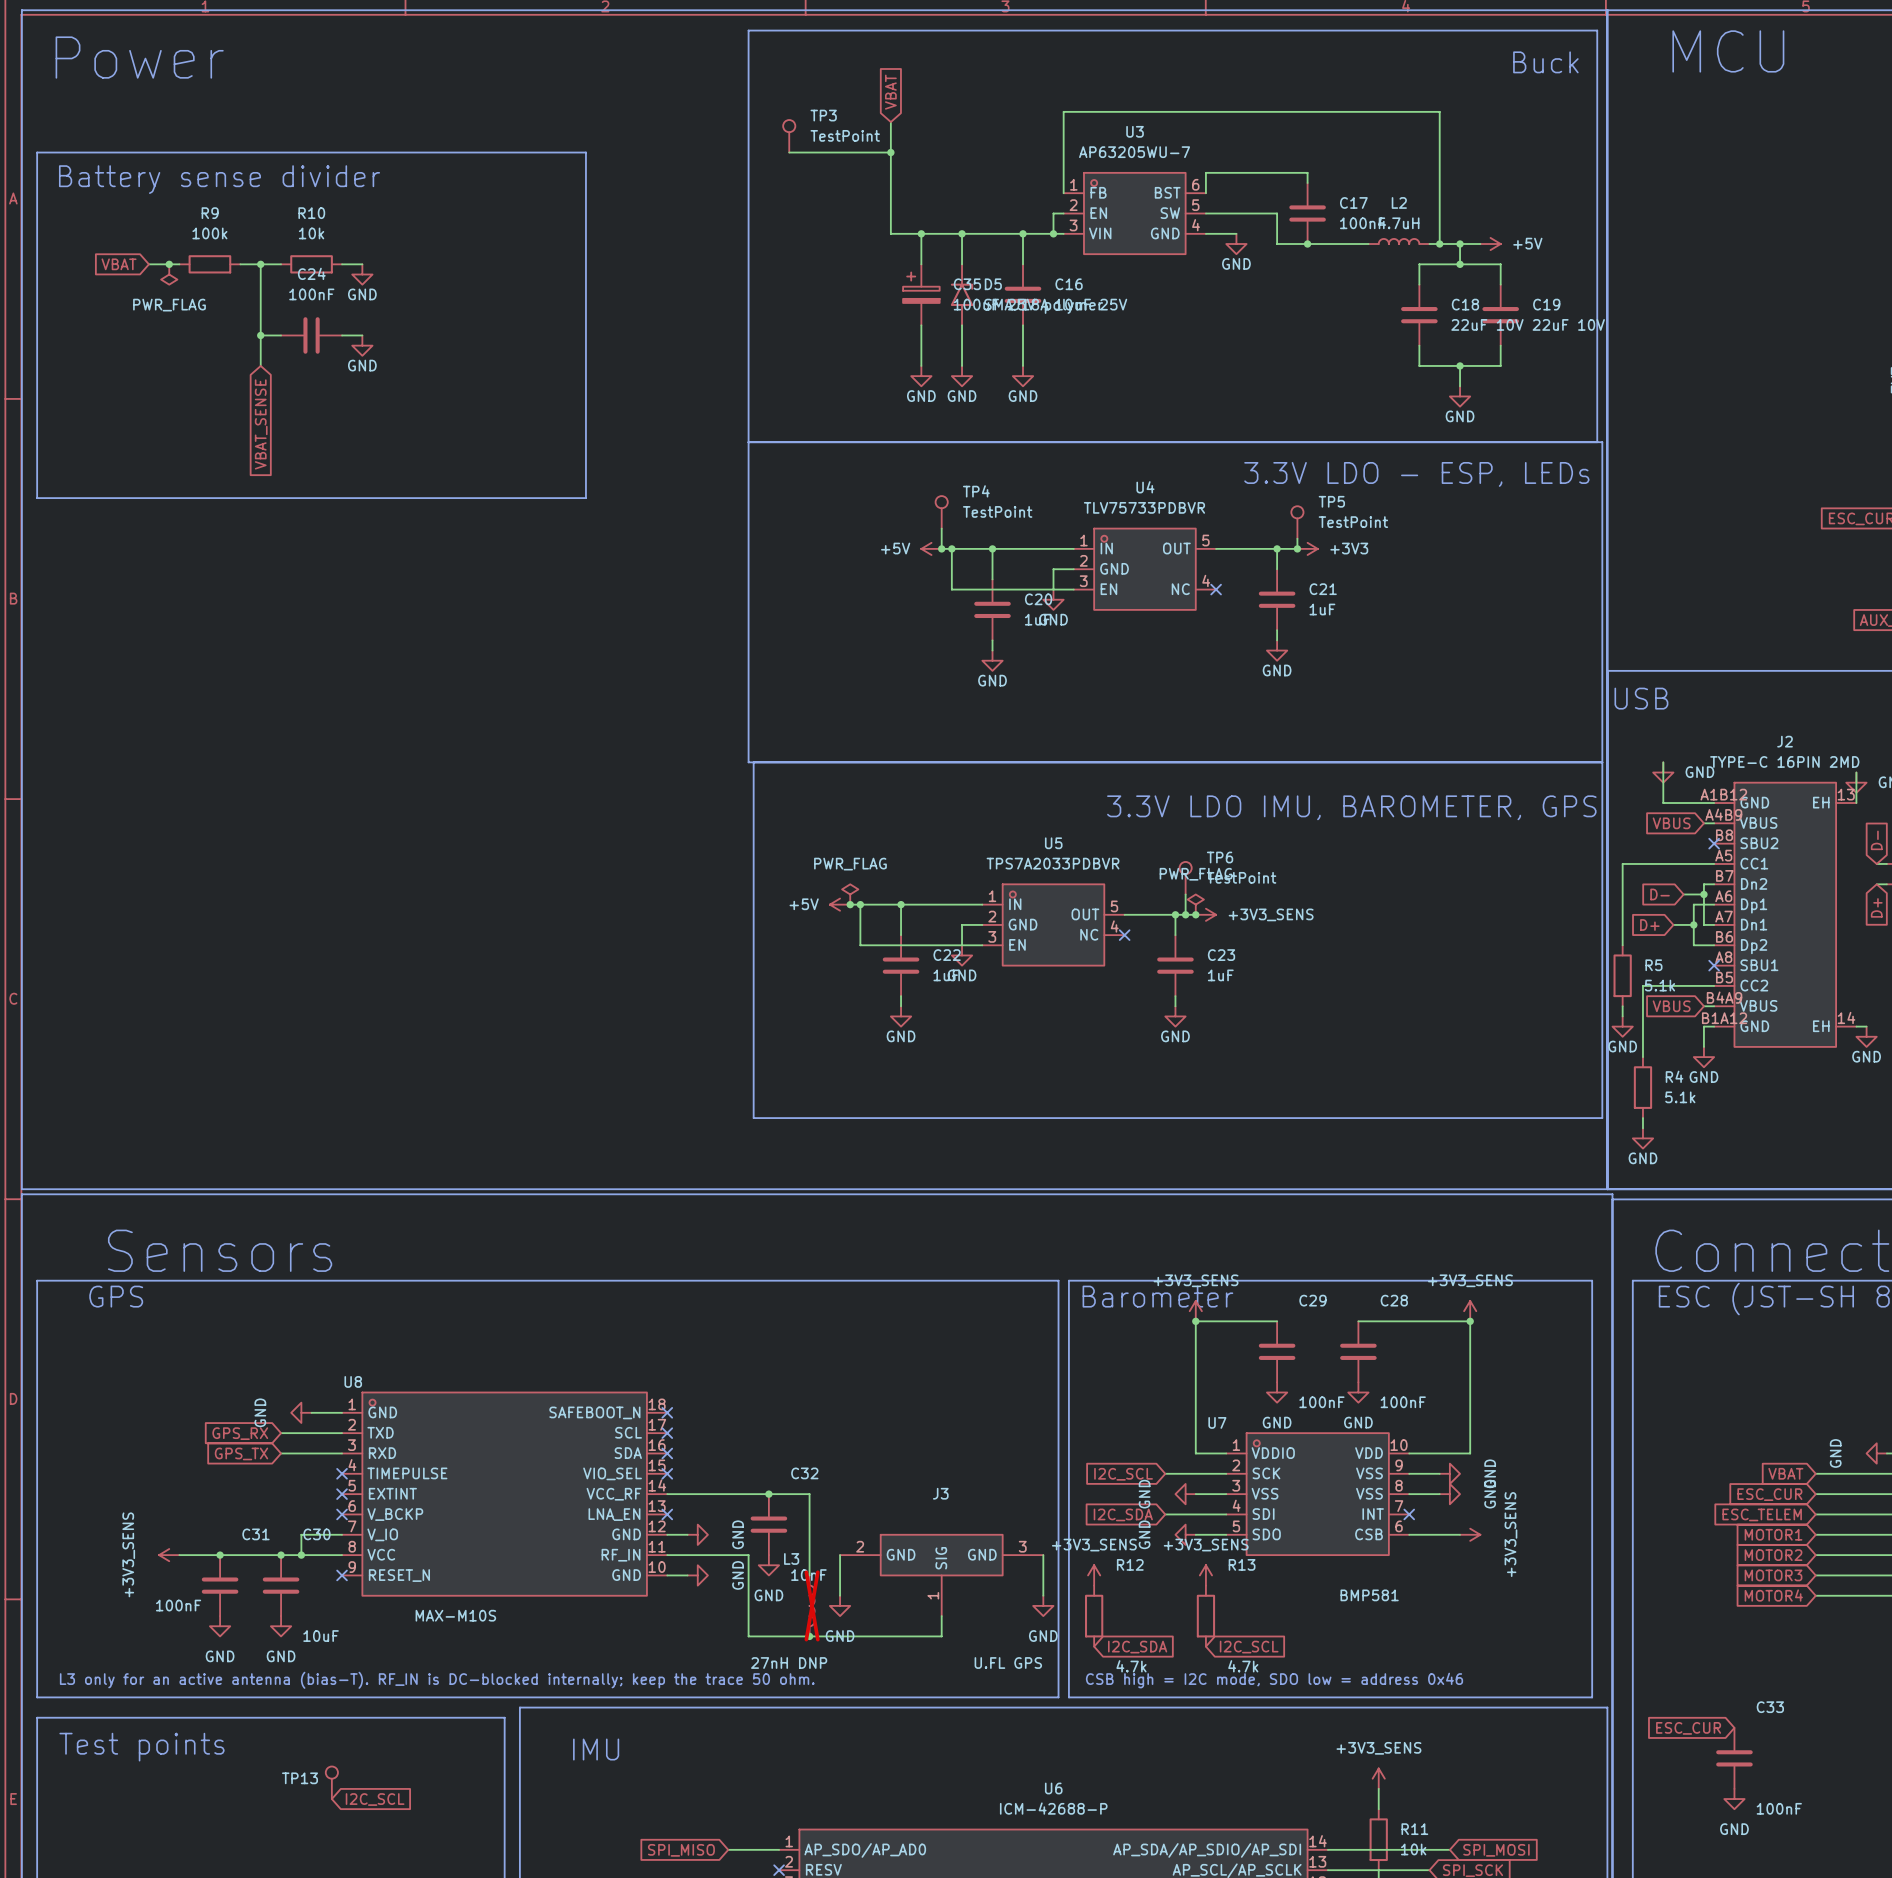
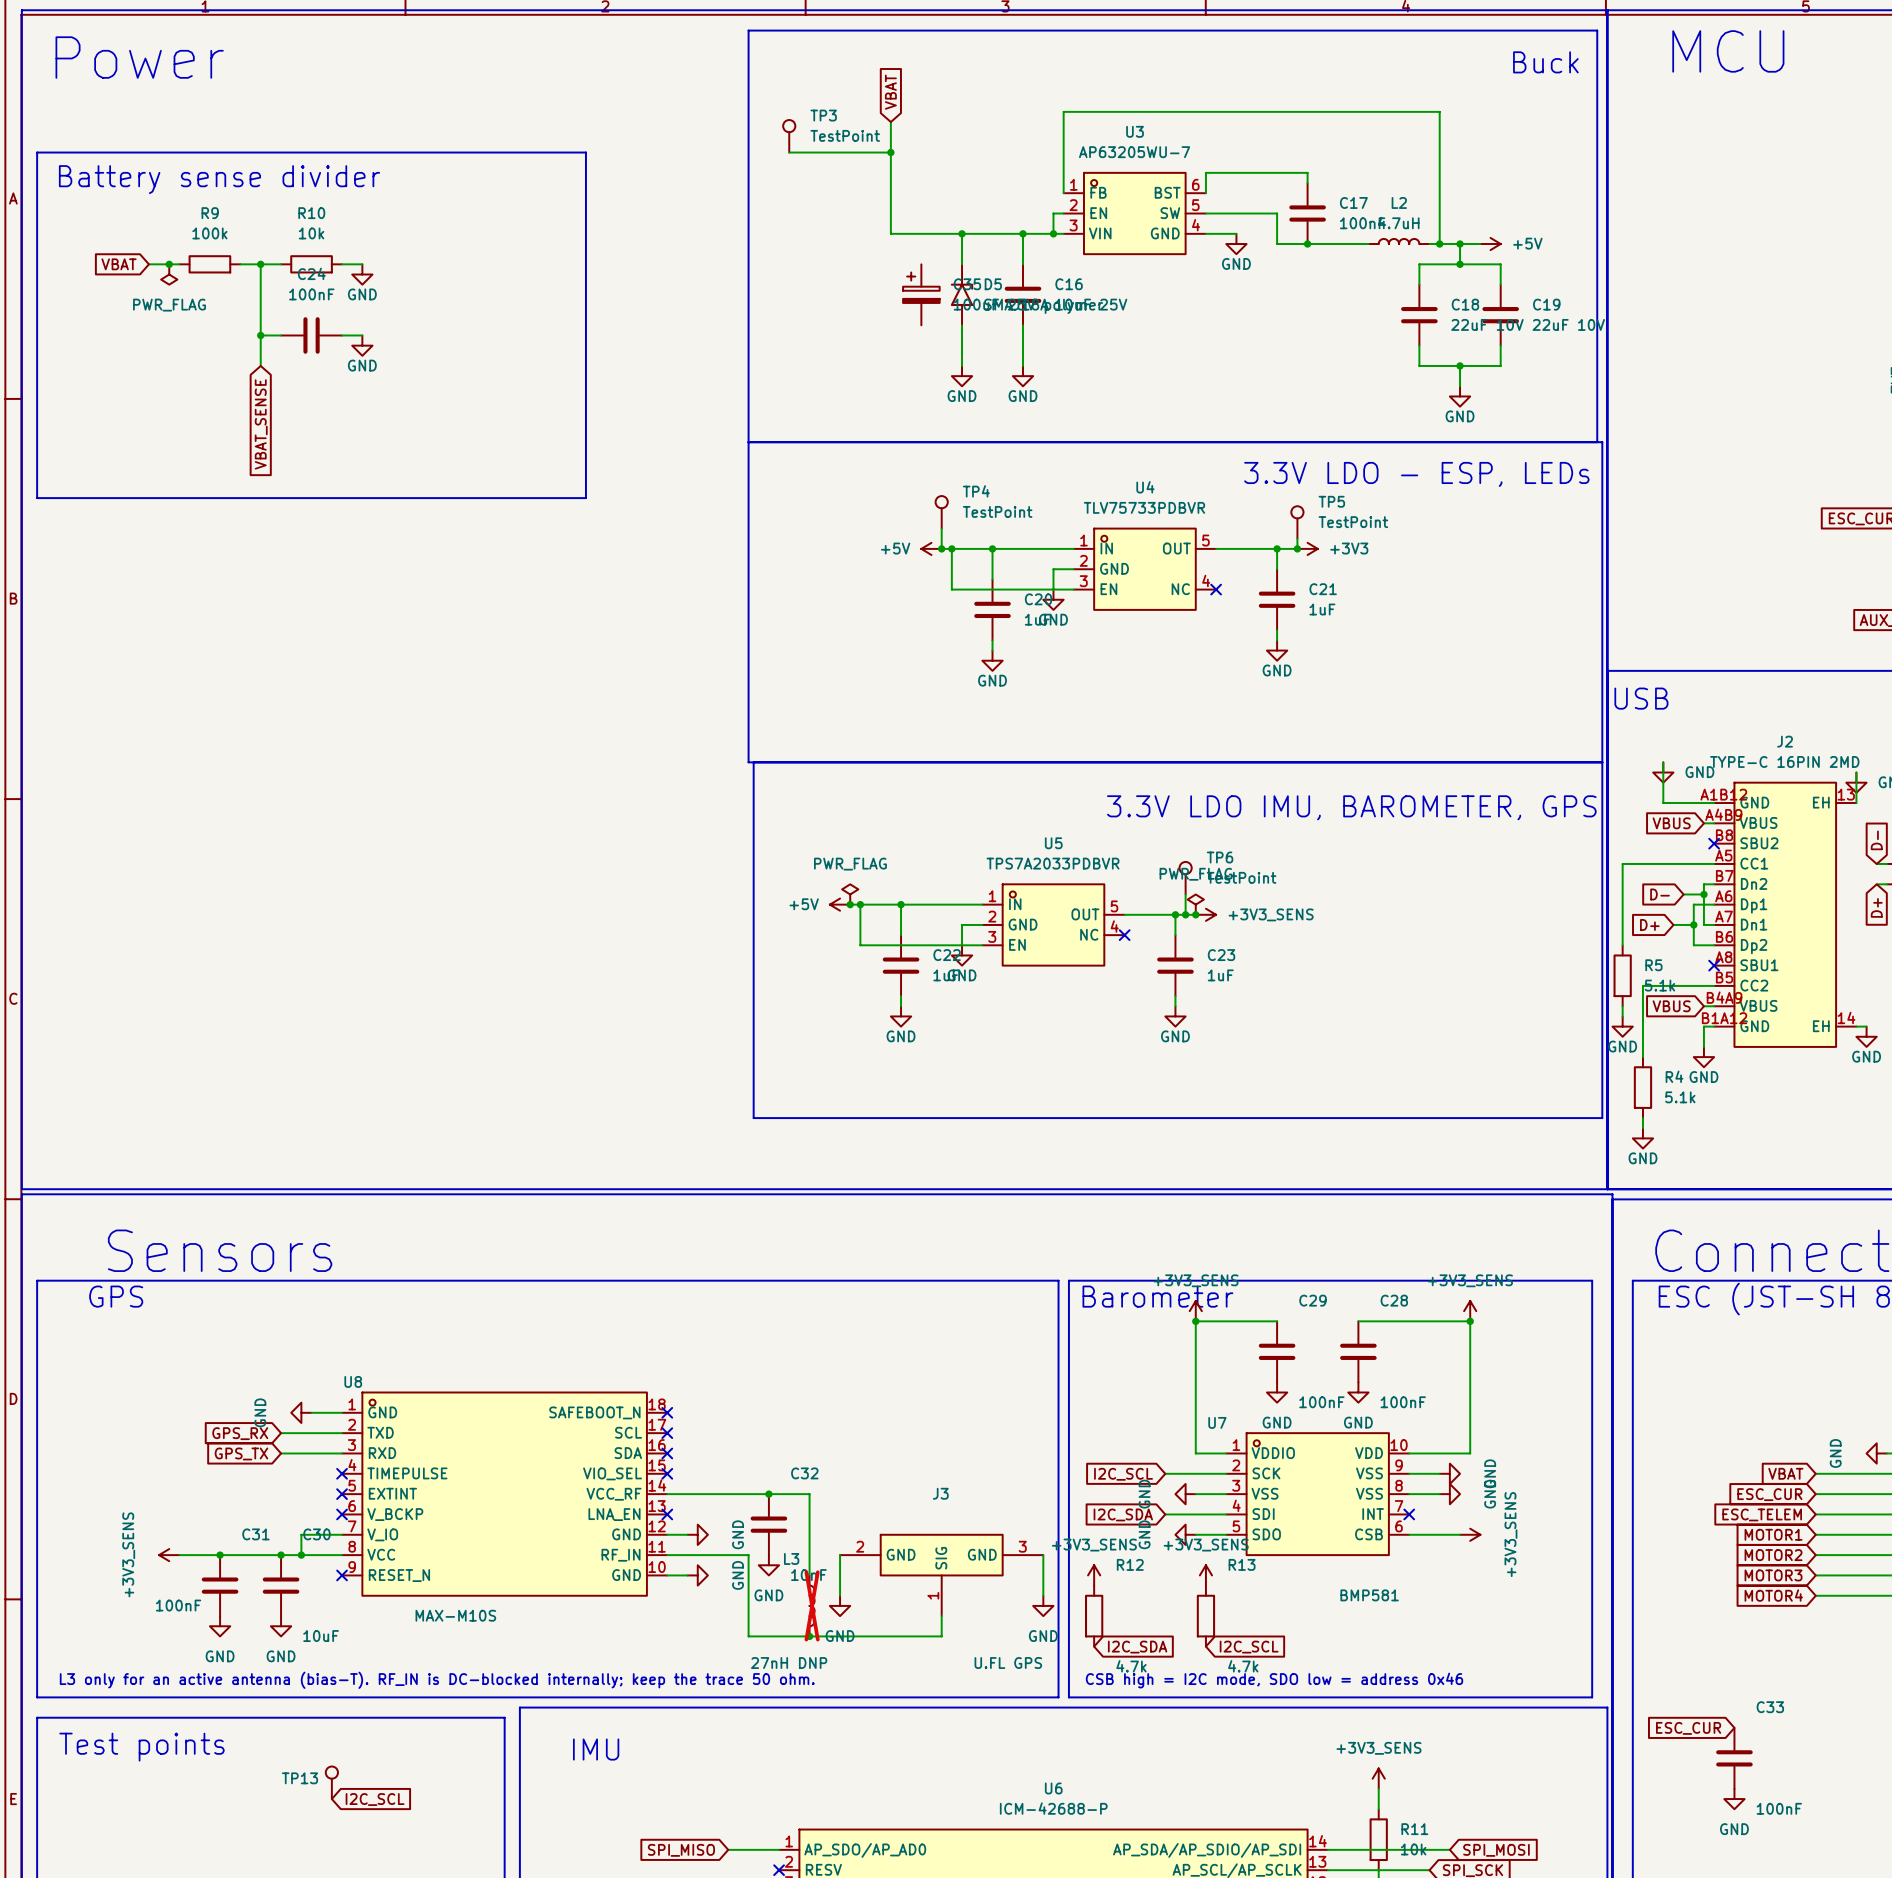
wire: (921, 233) (921, 264) -> none
junction: (921, 233) -> none
wire: (921, 325) (921, 365) -> none
power symbol: GND (921, 376) -> none

